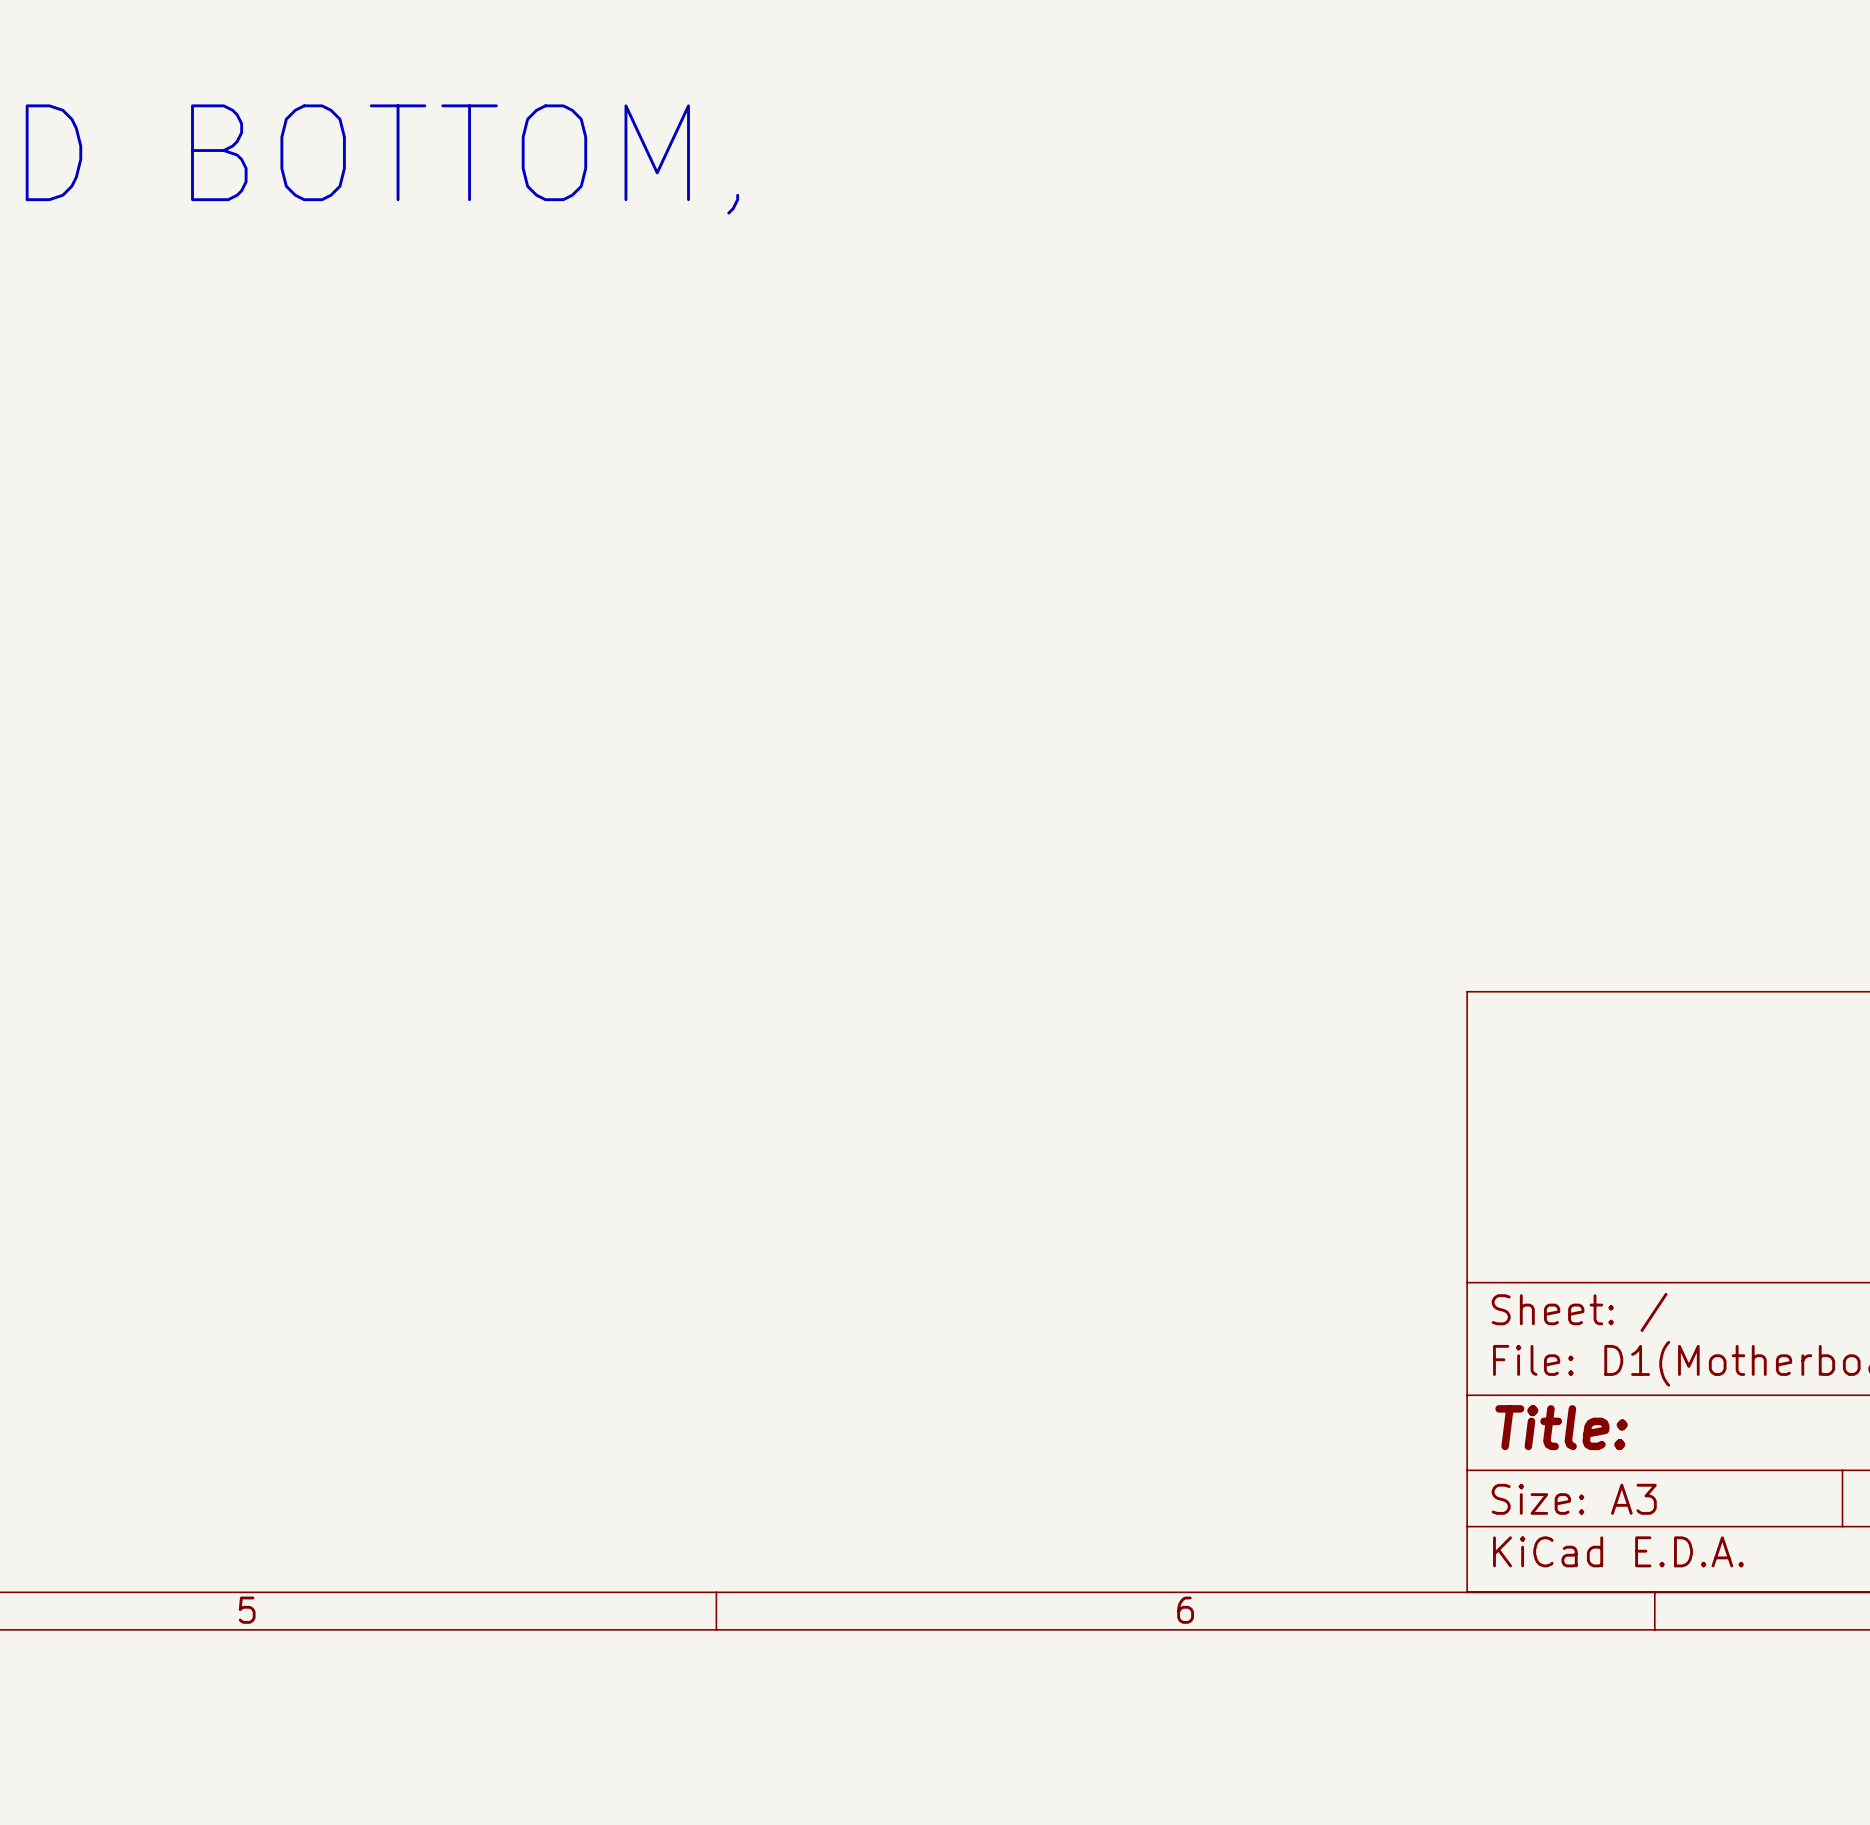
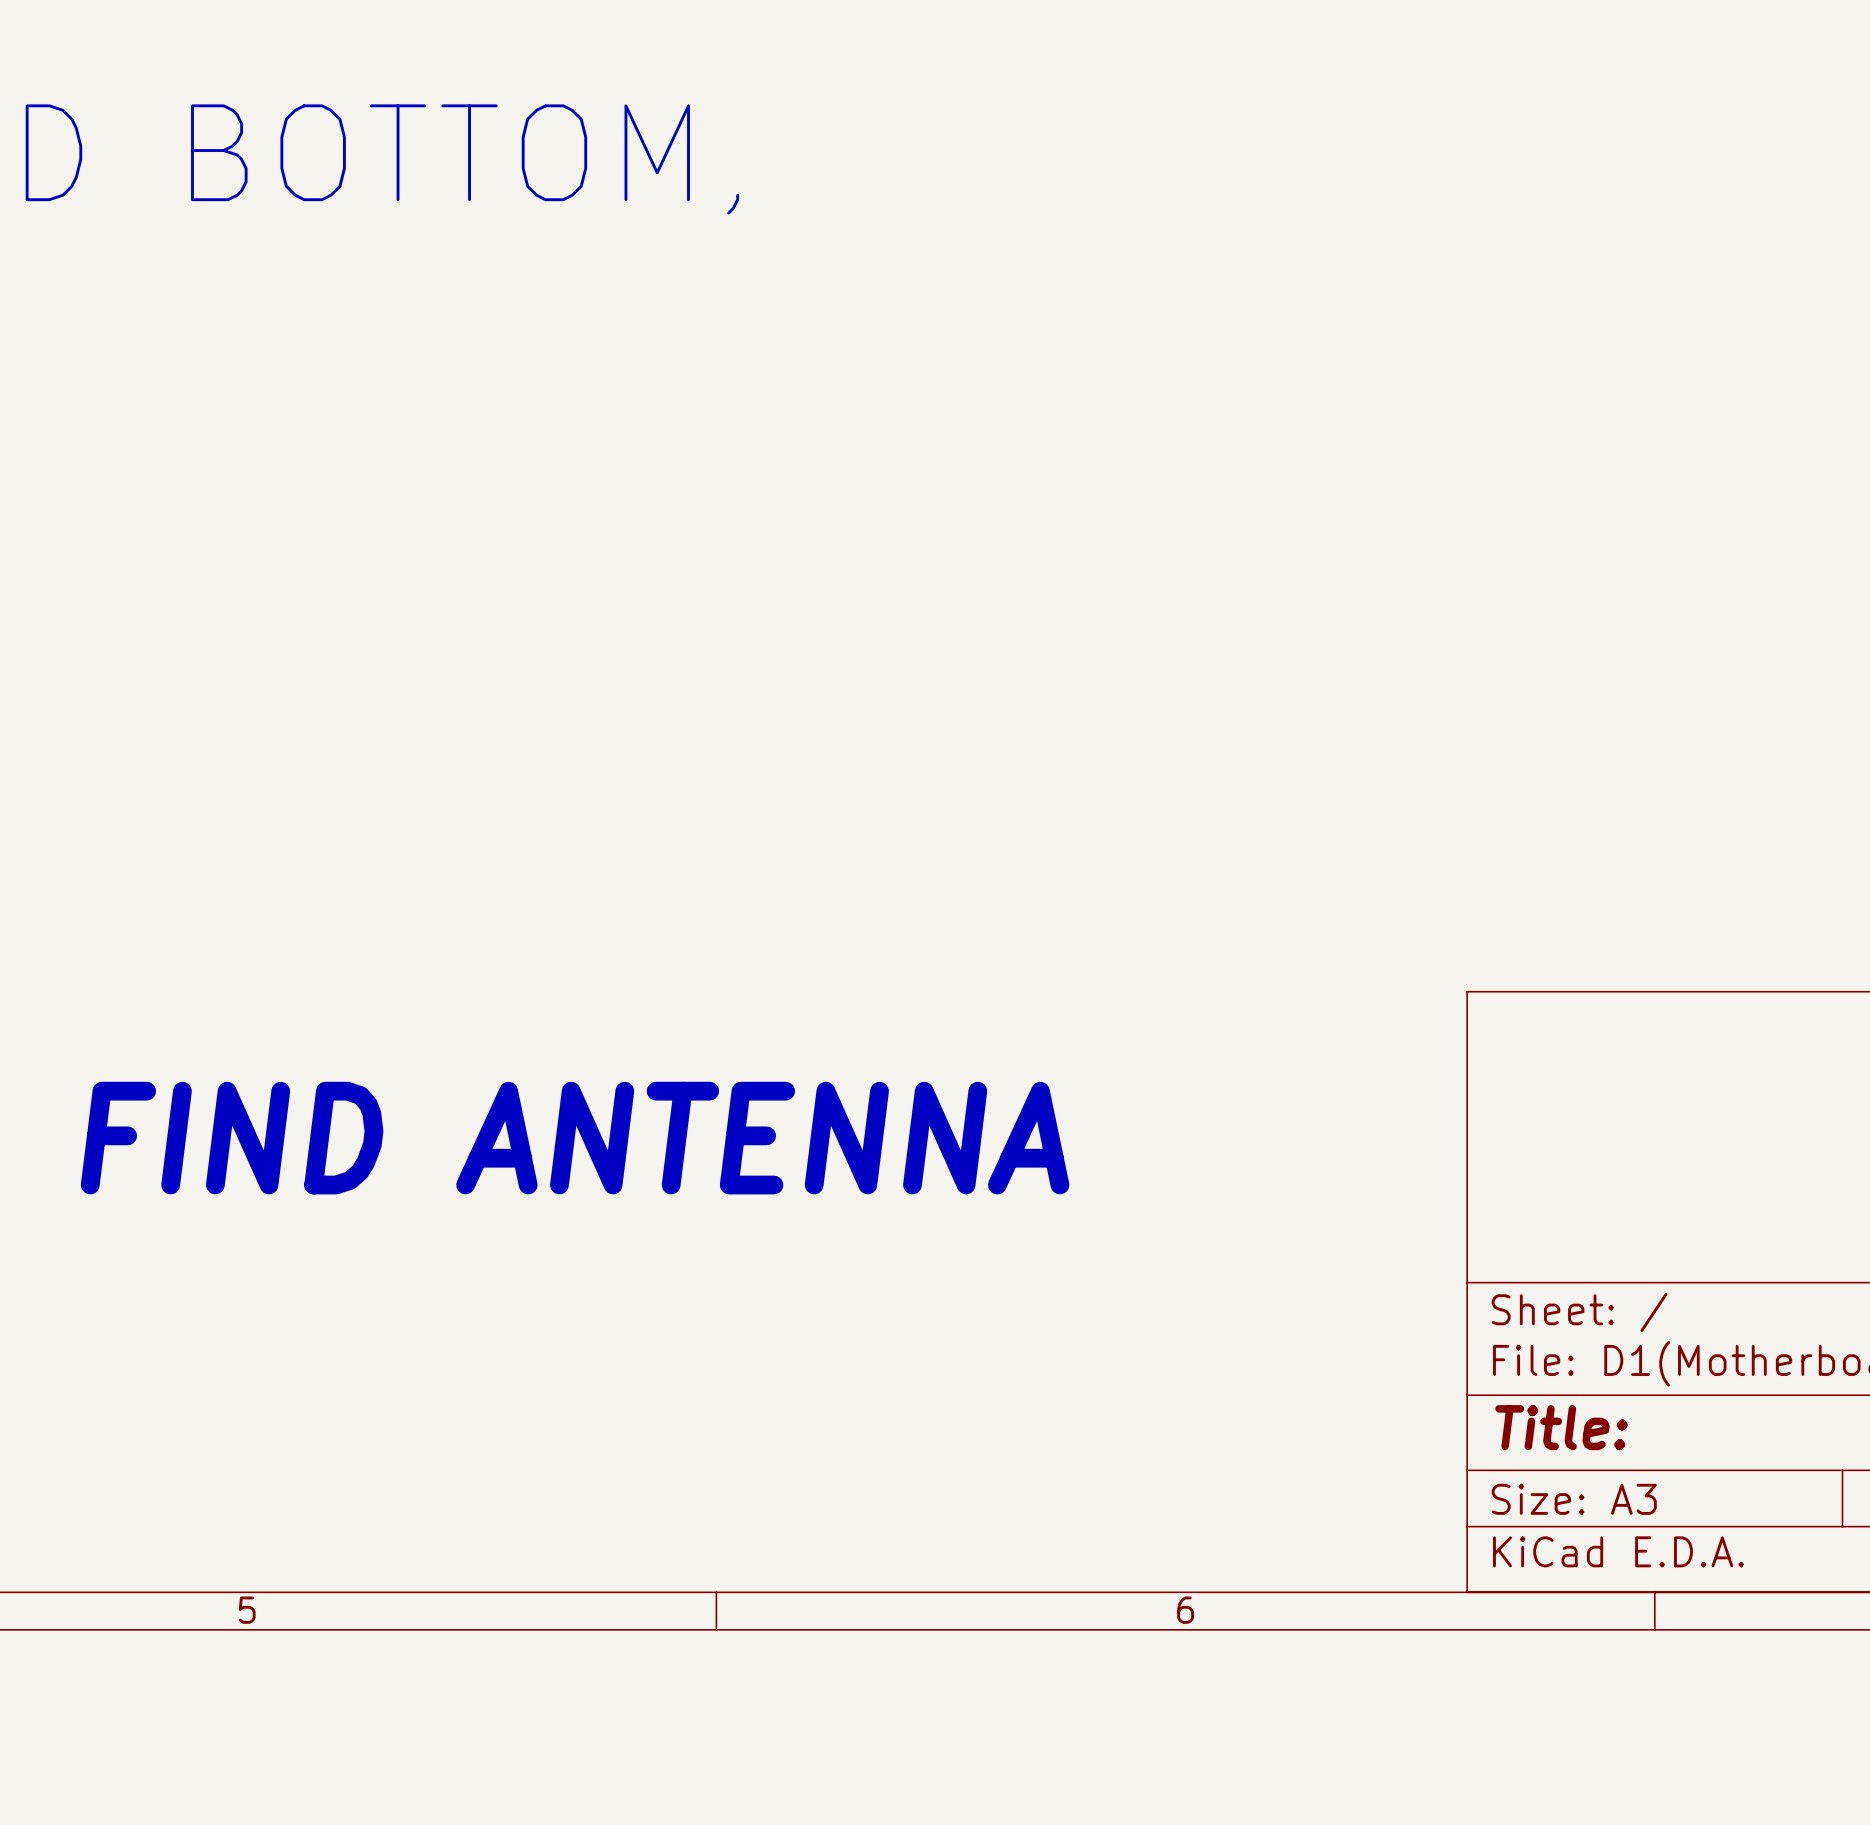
text: none -> FIND ANTENNA (575, 1138)

